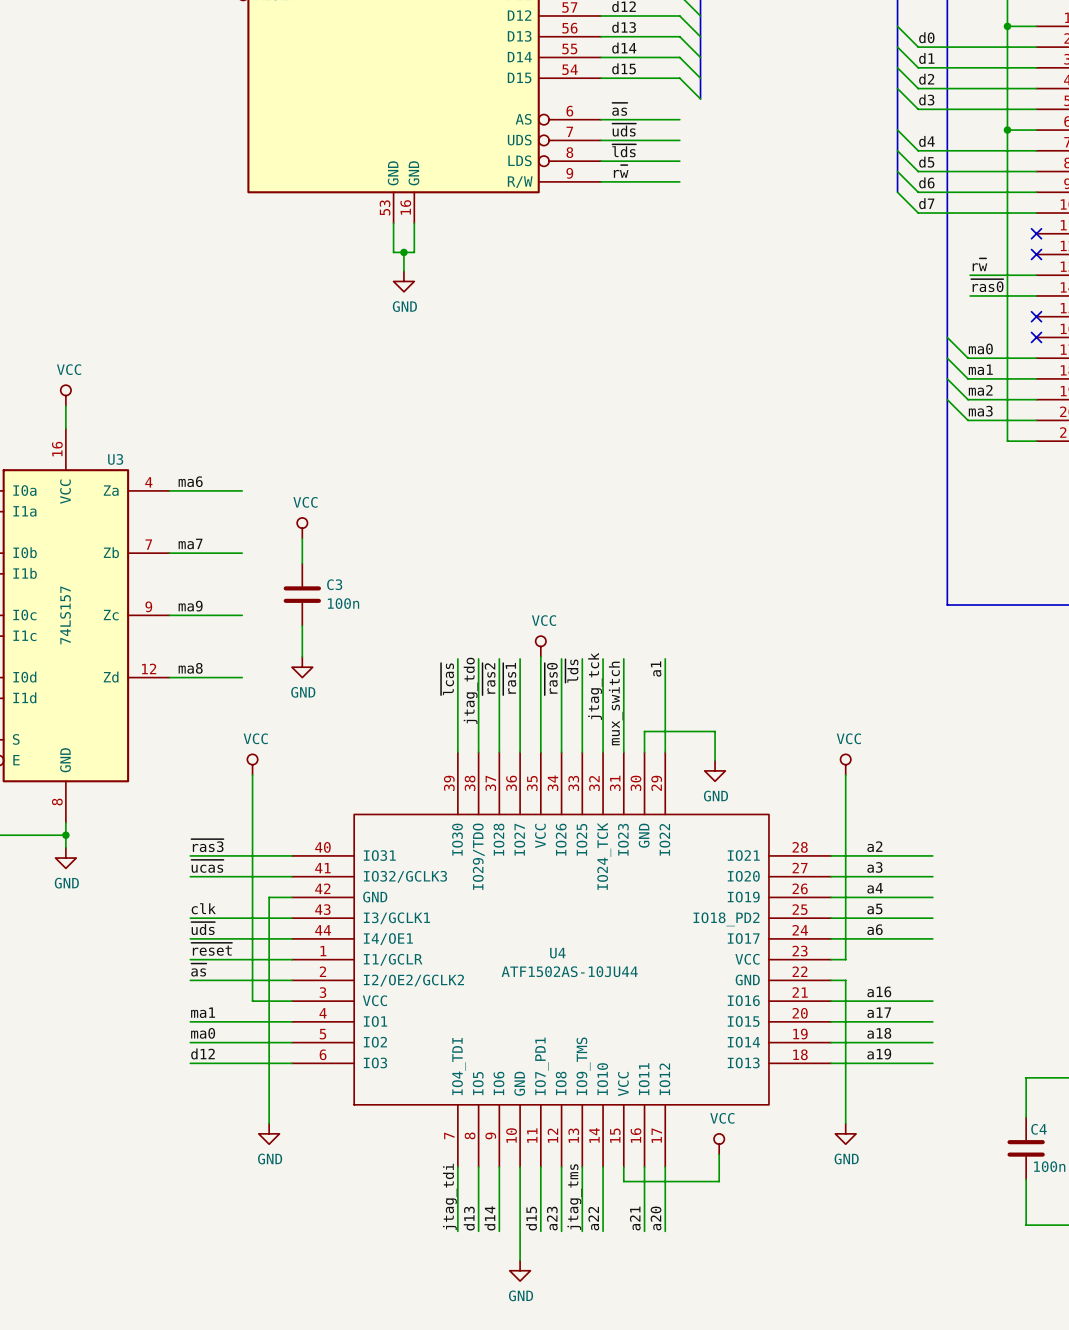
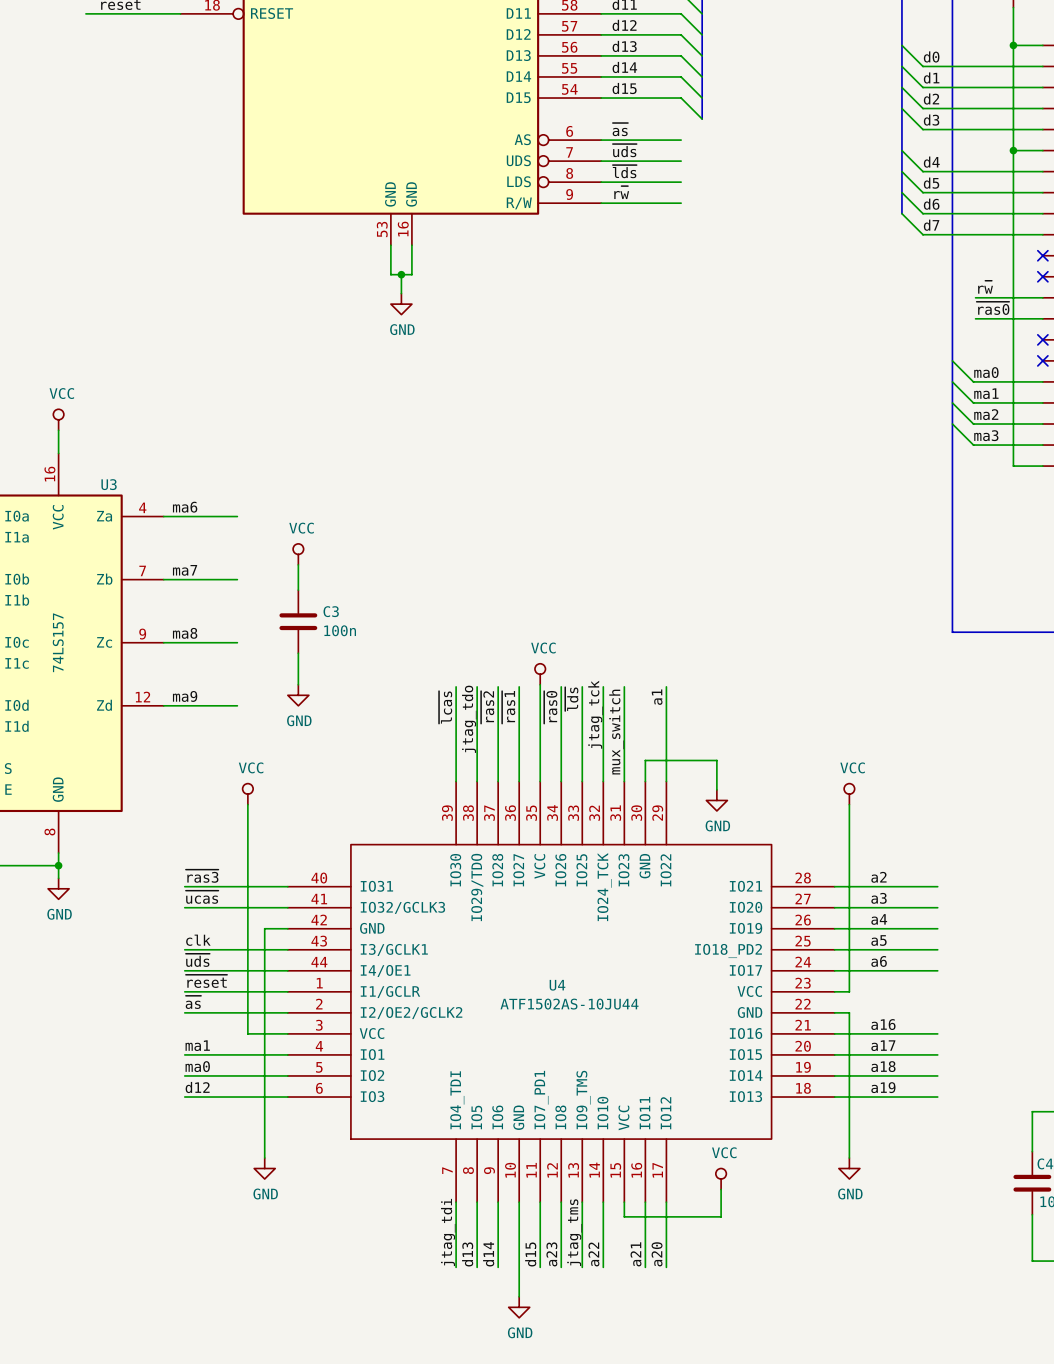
label: ma9 (190, 606) -> ma8 (185, 633)
label: ma8 (190, 668) -> ma9 (185, 696)

